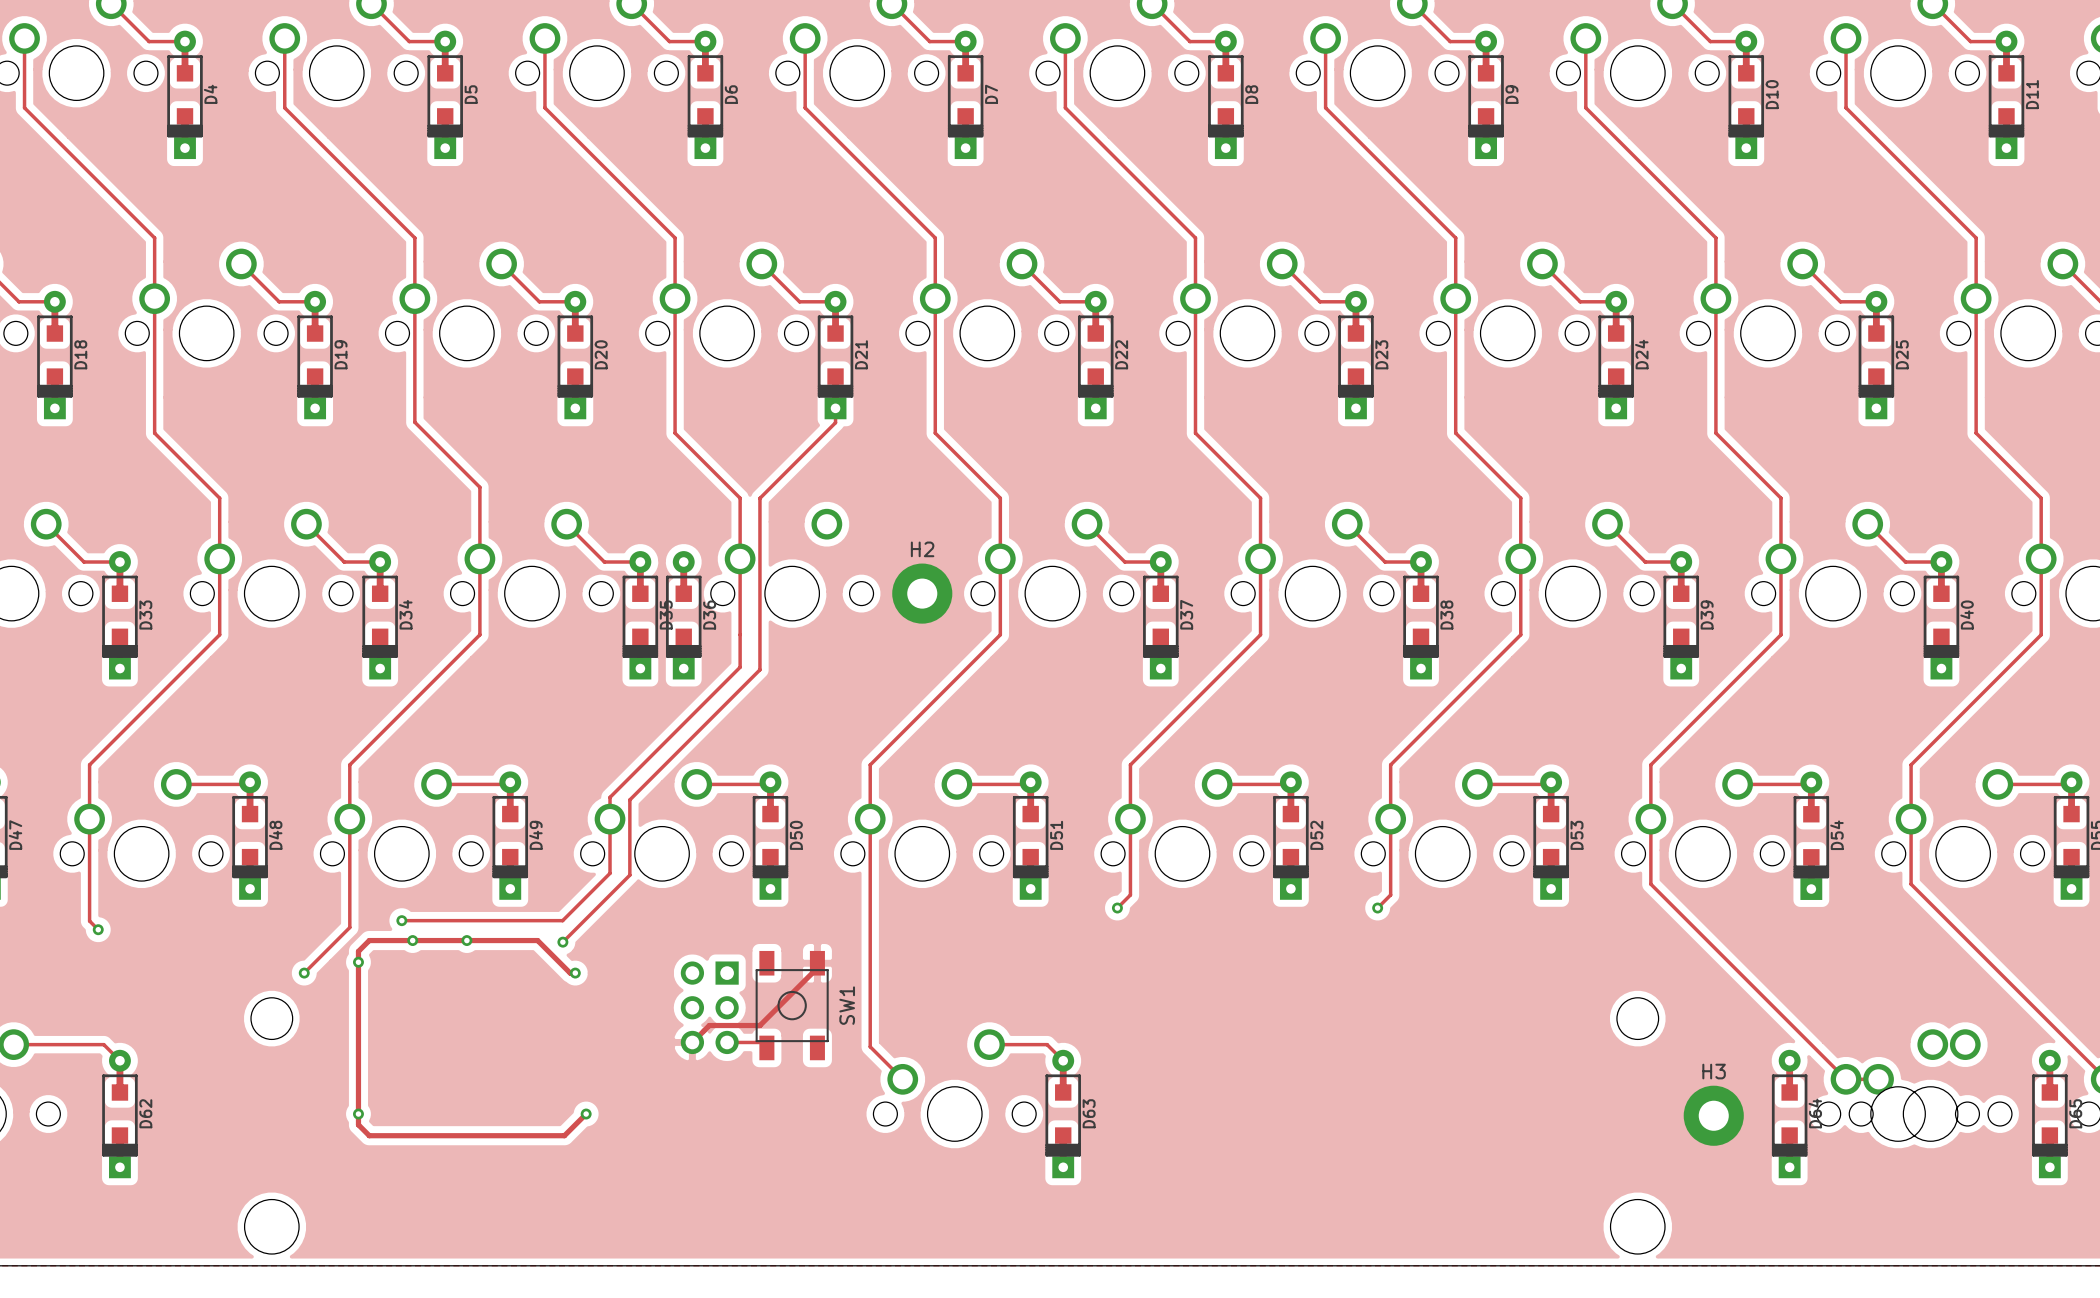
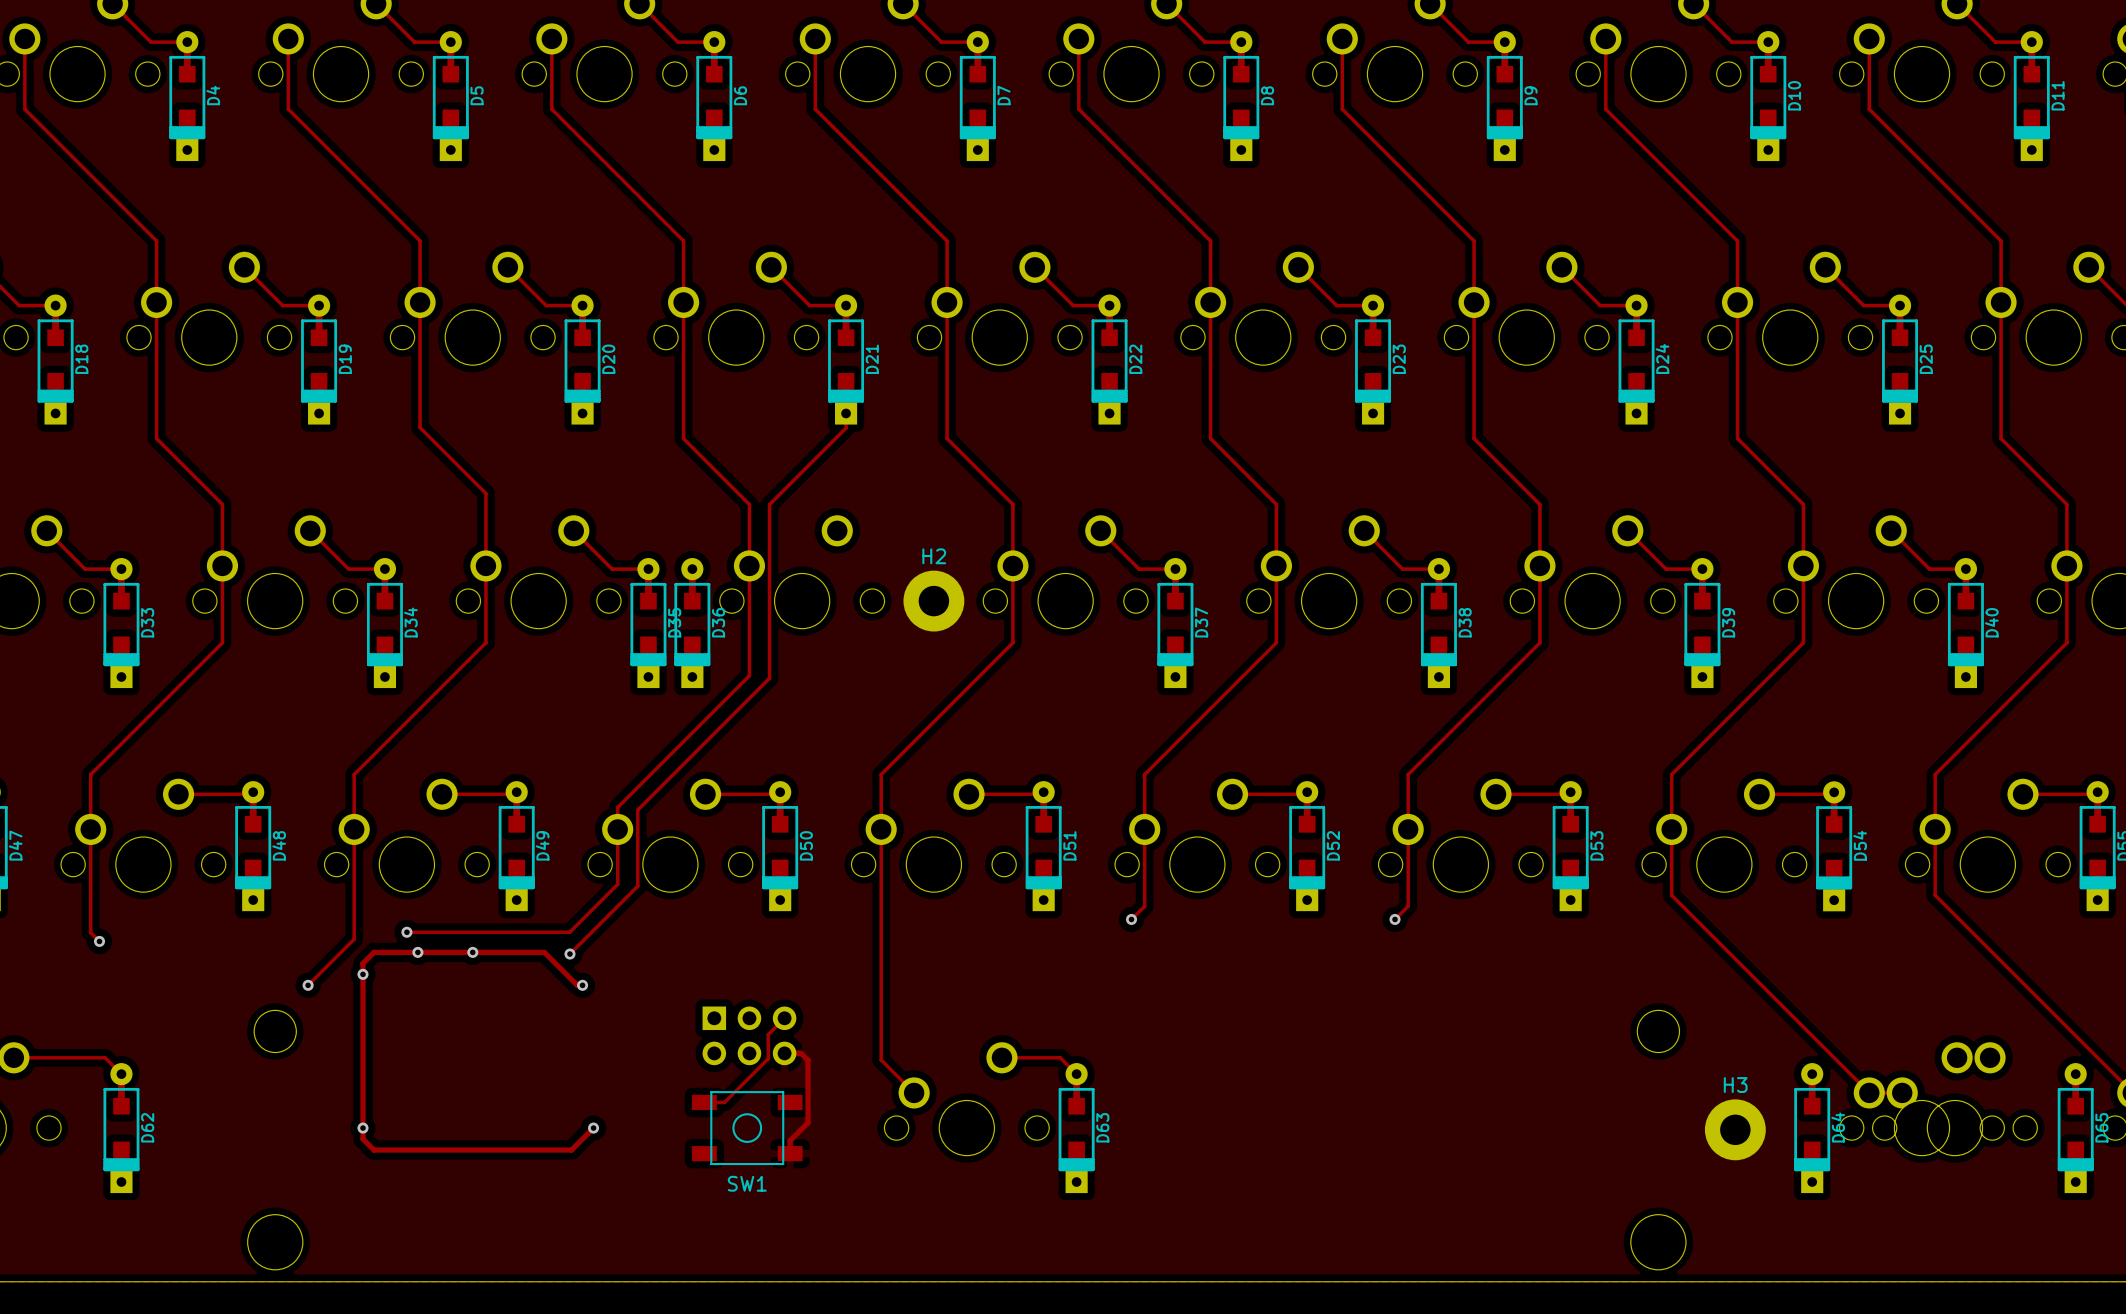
track: (817, 963) (817, 968) (759, 1025) (709, 1025) (692, 1042) -> none
track: none -> (784, 1018) (768, 1034) (768, 1058) (724, 1102) (704, 1102)
SW1 rotation: 0° (792, 1005) -> 90° clockwise (747, 1128)
SW1 position: (792, 1005) -> (747, 1128)
part rotation: 0° (709, 1007) -> 90° counterclockwise (749, 1035)
track: none -> (784, 1053) (801, 1053) (807, 1060) (807, 1122) (790, 1140) (790, 1153)
track: (727, 1042) (761, 1042) (766, 1047) -> none

